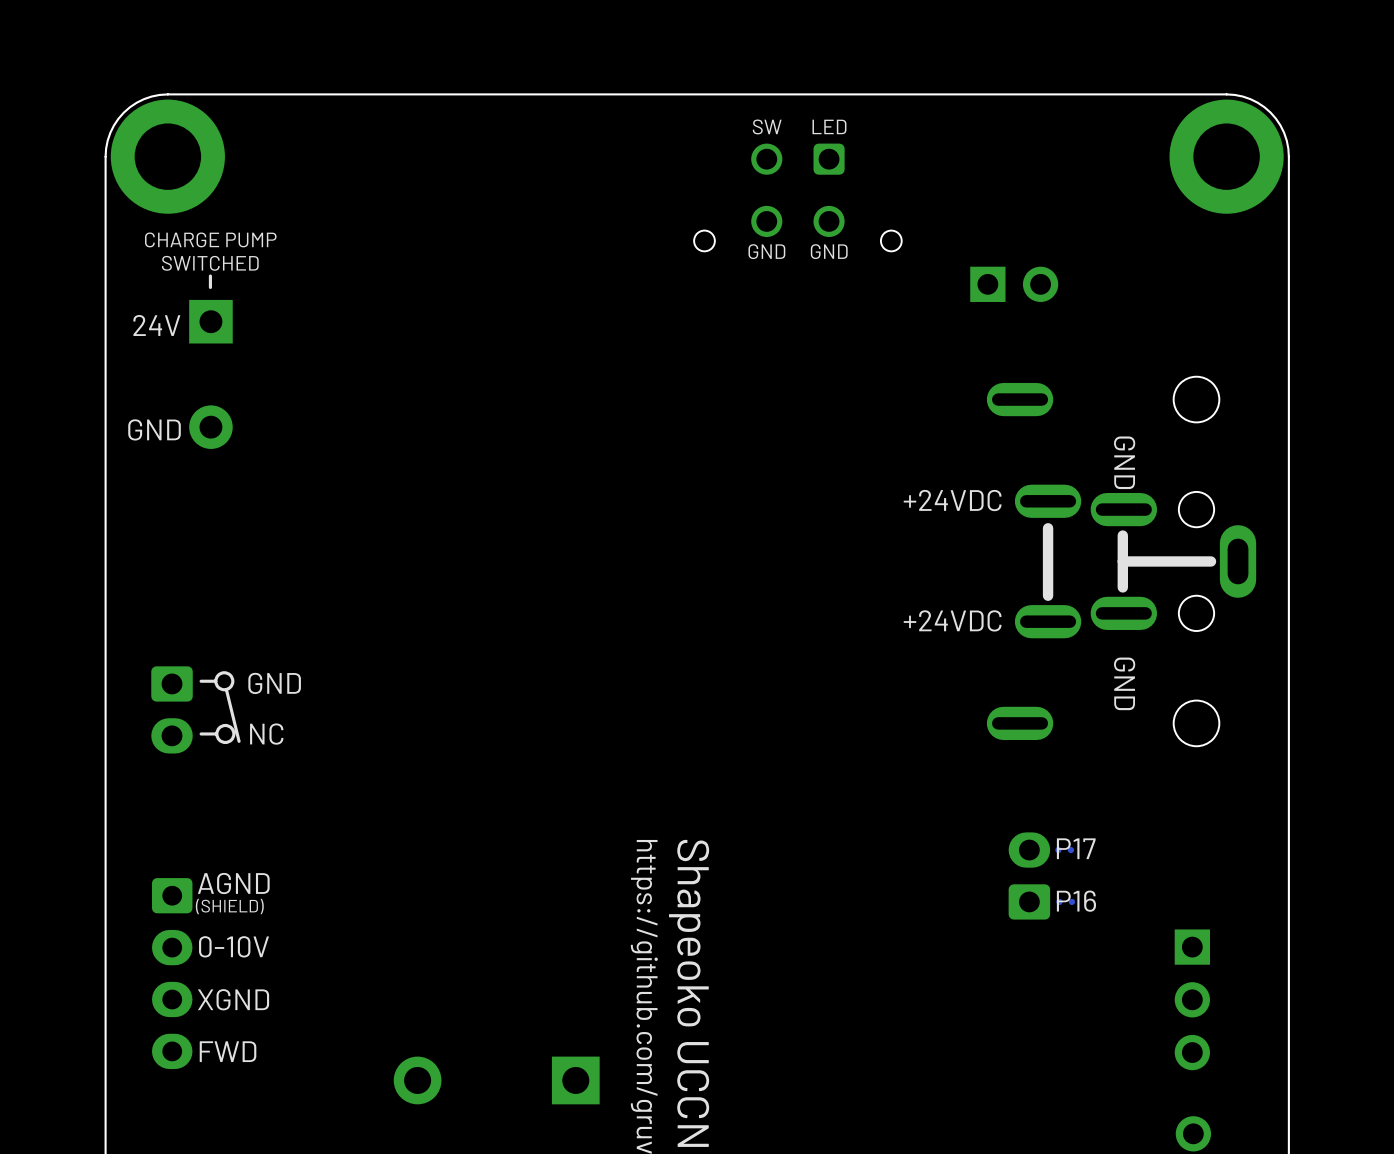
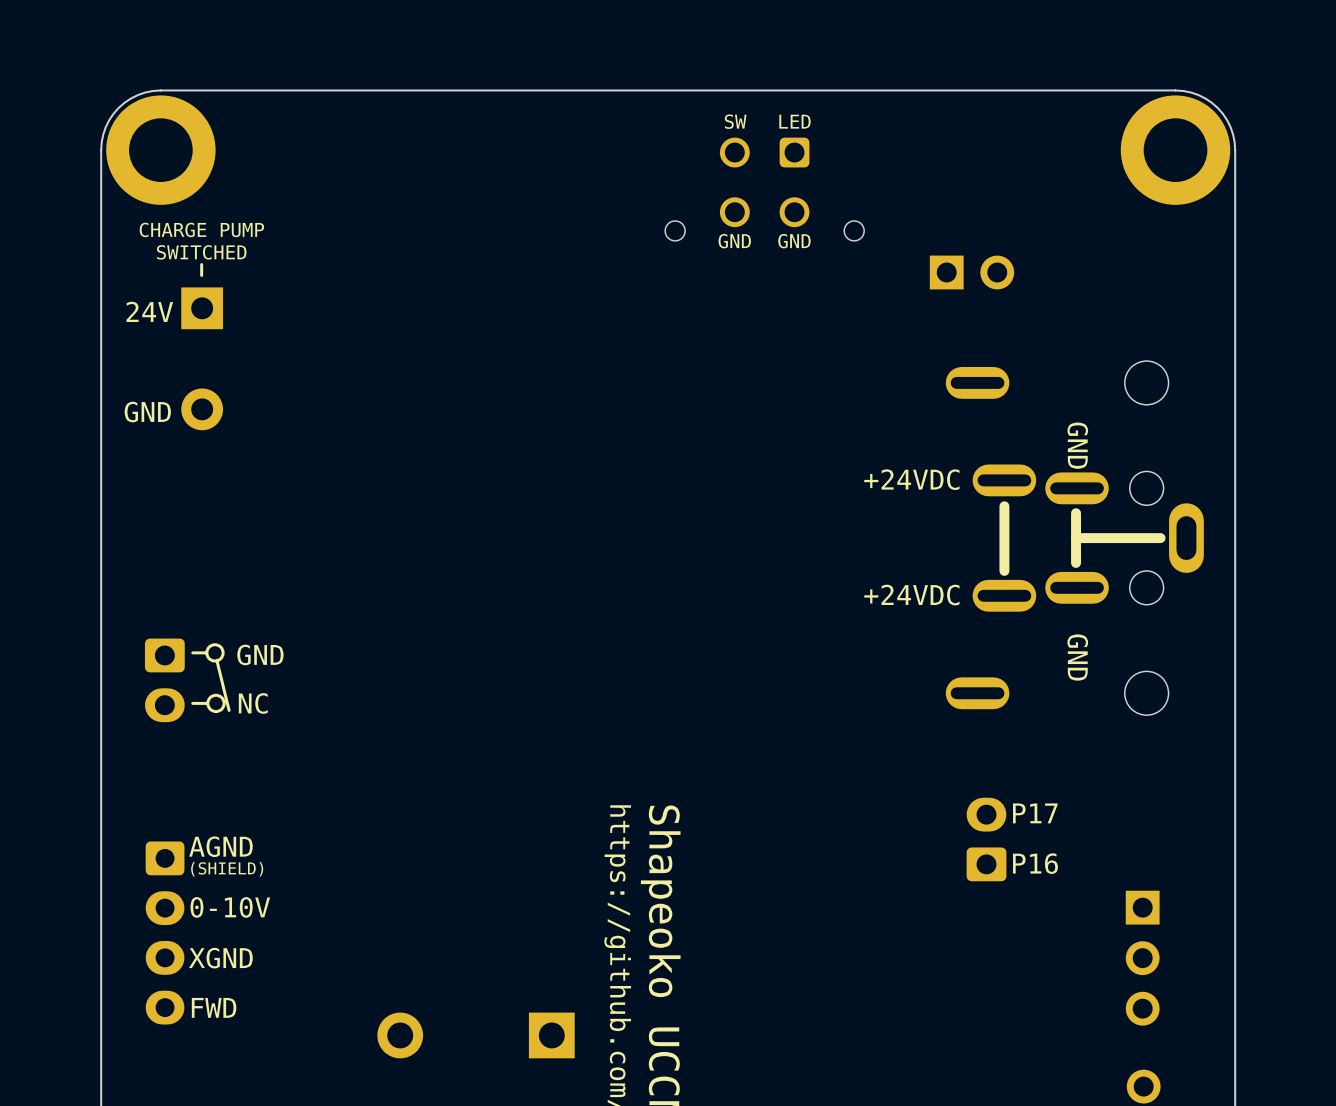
part: (1064, 850) -> none
part: (1065, 901) -> none

